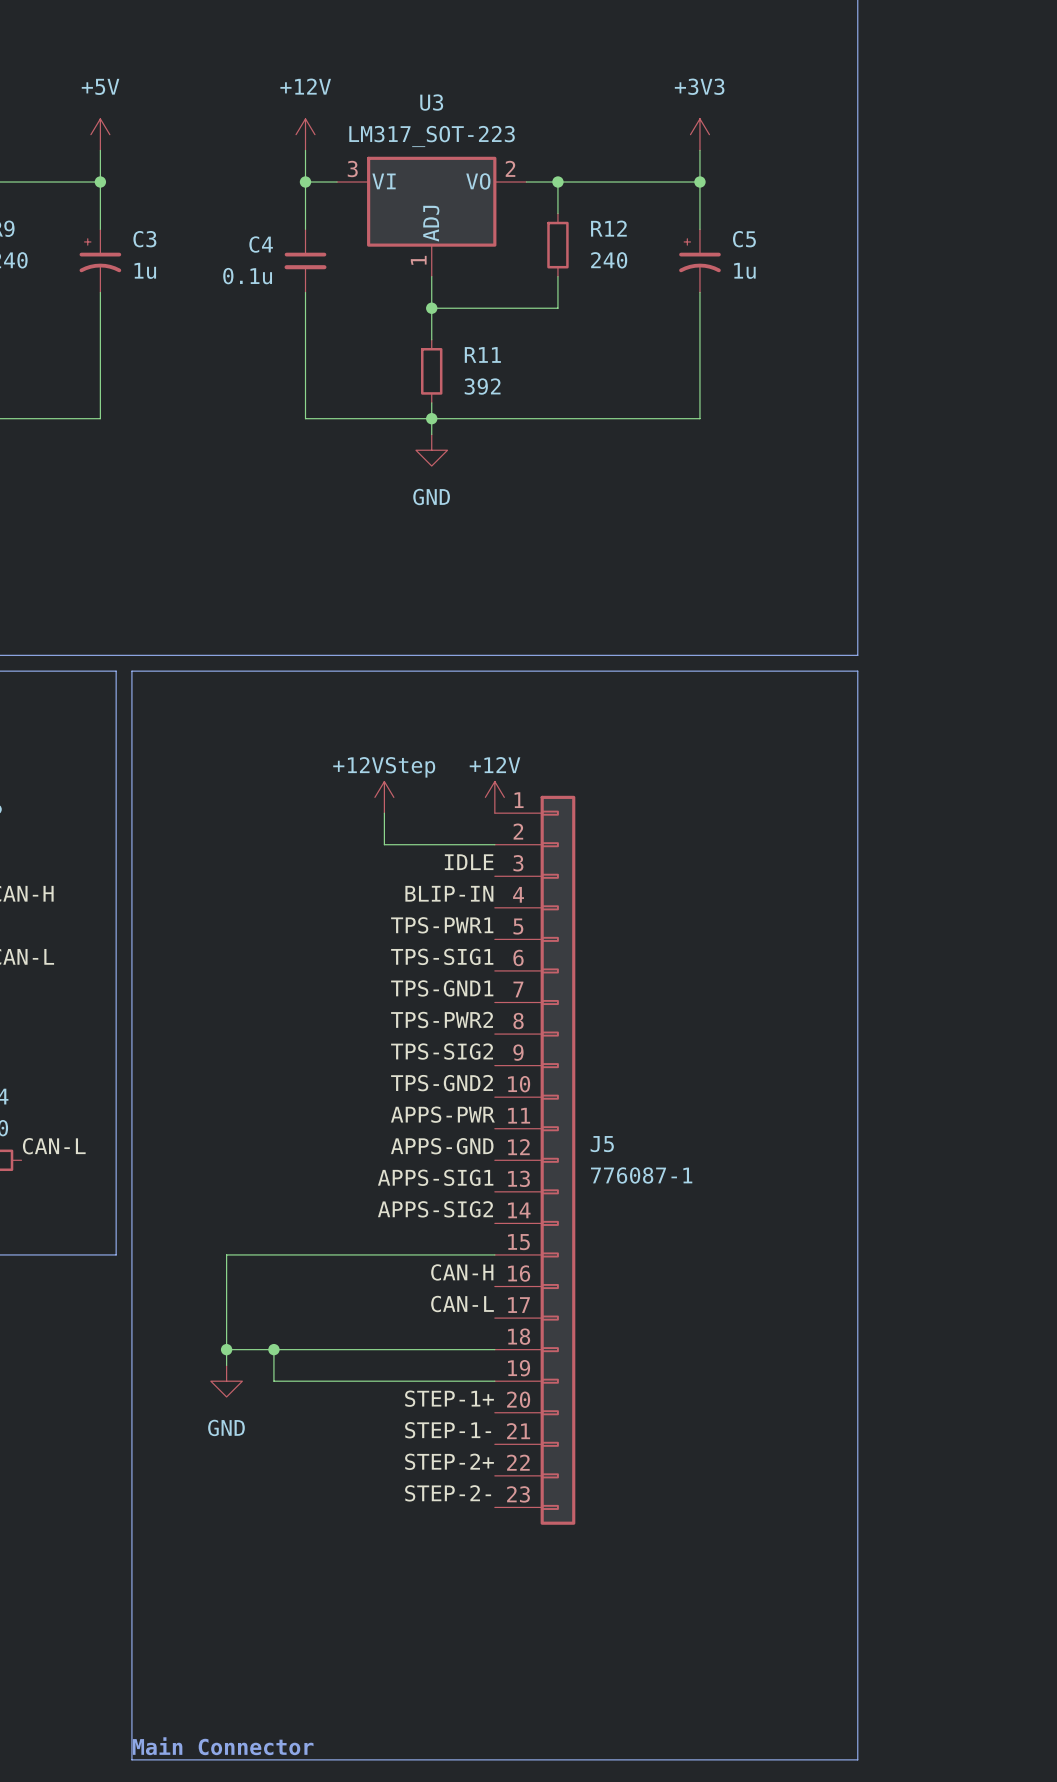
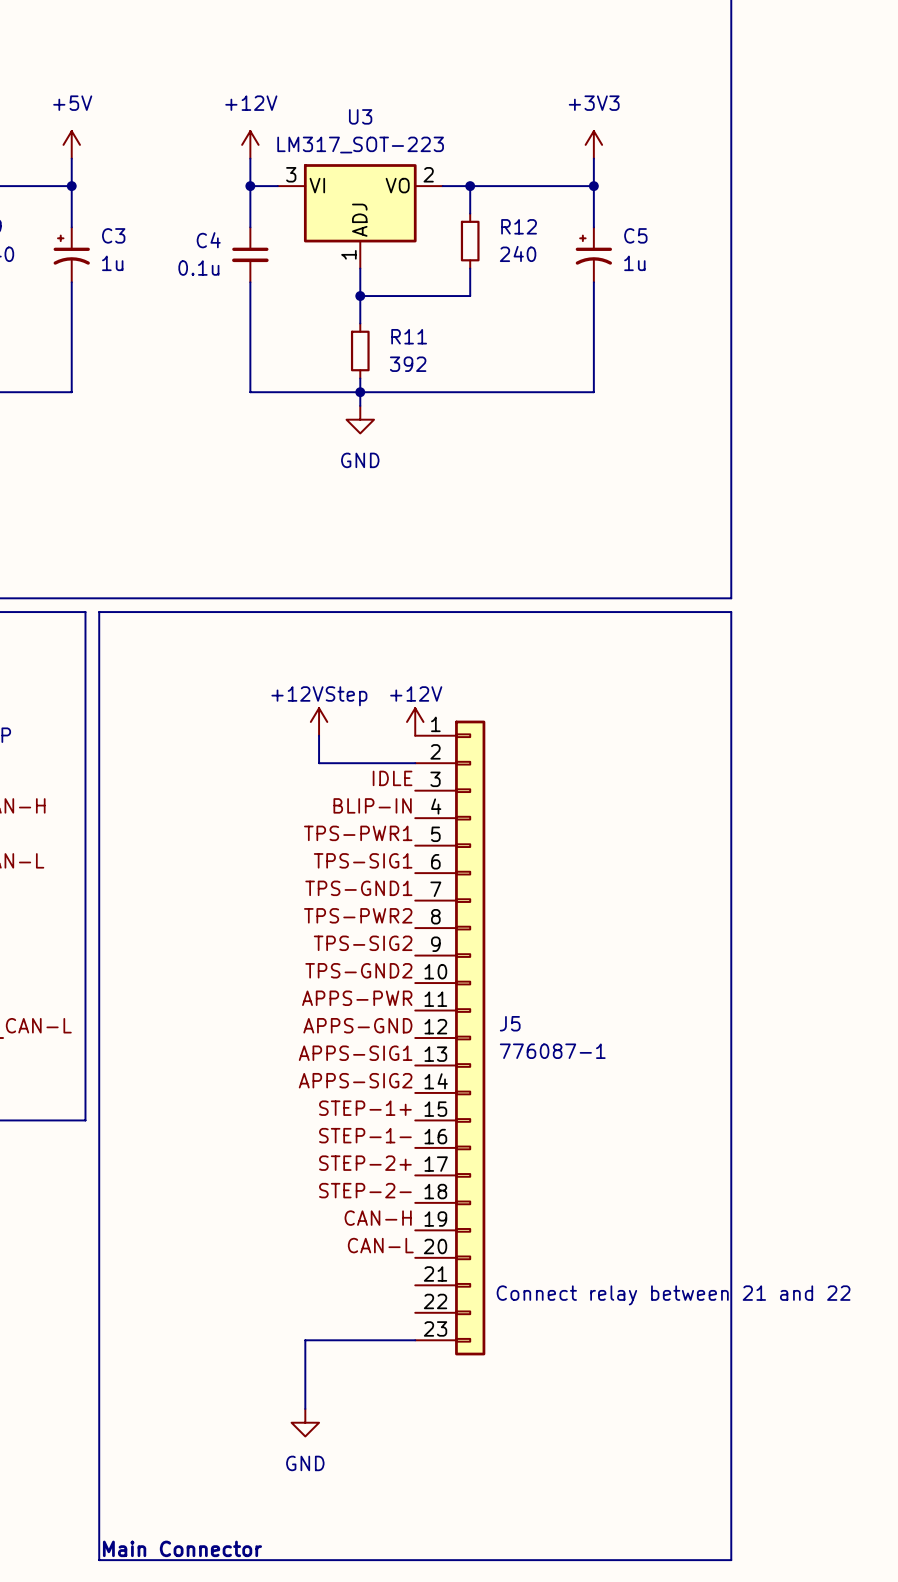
label: none -> STEP-1+ (365, 1108)
wire: (494, 1254) (226, 1254) (226, 1365) -> none
label: CAN-H (462, 1272) -> STEP-1- (365, 1135)
label: CAN-L (462, 1304) -> STEP-2+ (365, 1163)
wire: (226, 1349) (494, 1349) -> none
junction: (226, 1349) -> none
wire: (273, 1349) (273, 1381) (494, 1381) -> none
junction: (273, 1349) -> none
label: none -> CAN-H (378, 1218)
power symbol position: GND (226, 1381) -> GND (305, 1422)
label: STEP-1+ (449, 1398) -> CAN-L (380, 1245)
label: STEP-1- (448, 1430) -> none
text: none -> Connect relay between 21 and 22 (673, 1295)
label: STEP-2+ (449, 1461) -> none
label position: STEP-2- (448, 1493) -> STEP-2- (365, 1190)
wire: none -> (415, 1340) (305, 1340) (305, 1408)

